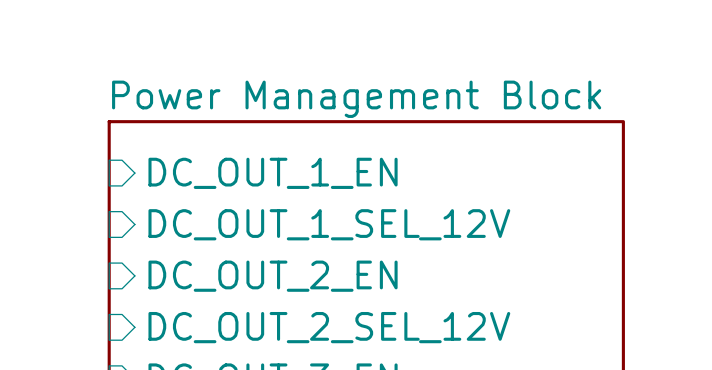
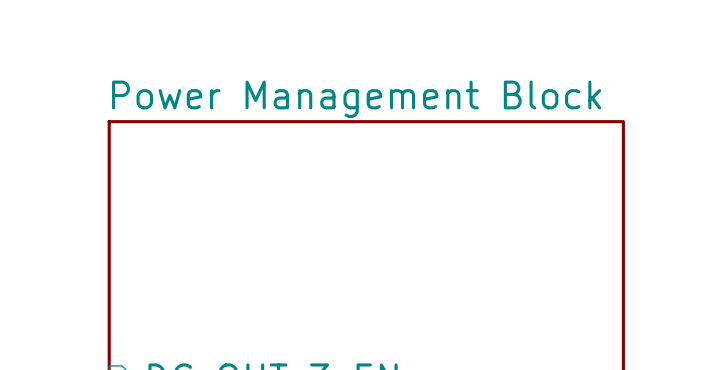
sheet pin: DC_OUT_1_EN (273, 173) -> none
sheet pin: DC_OUT_1_SEL_12V (329, 224) -> none
sheet pin: DC_OUT_2_EN (273, 276) -> none
sheet pin: DC_OUT_2_SEL_12V (329, 327) -> none

